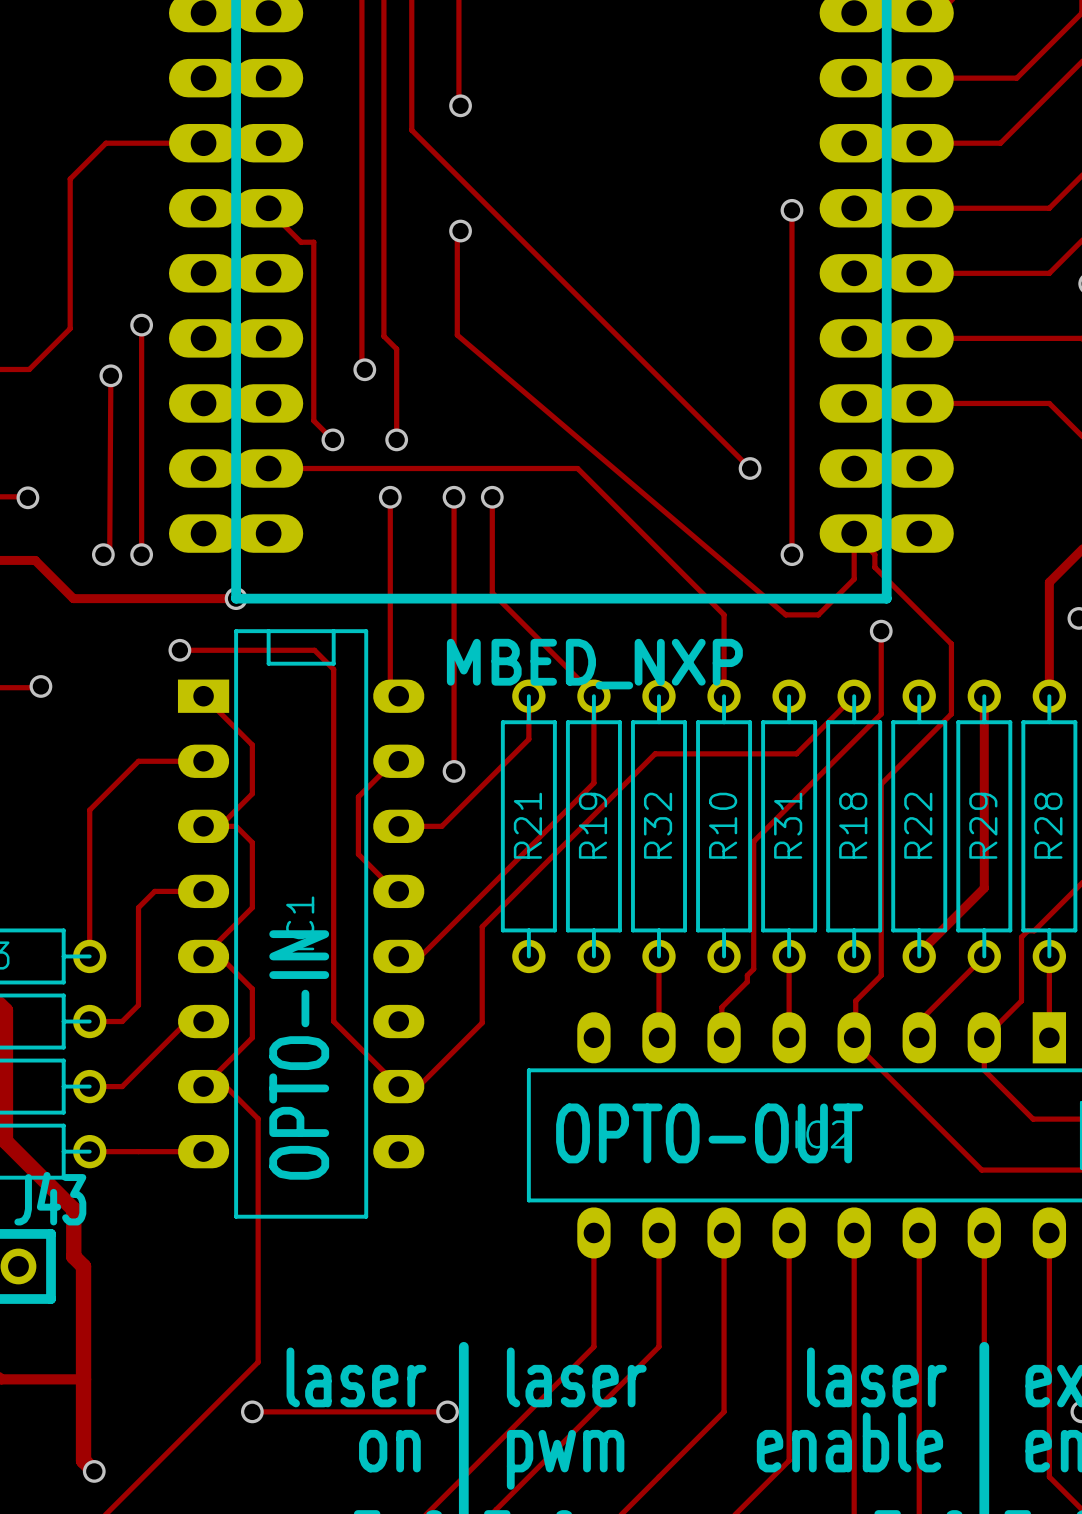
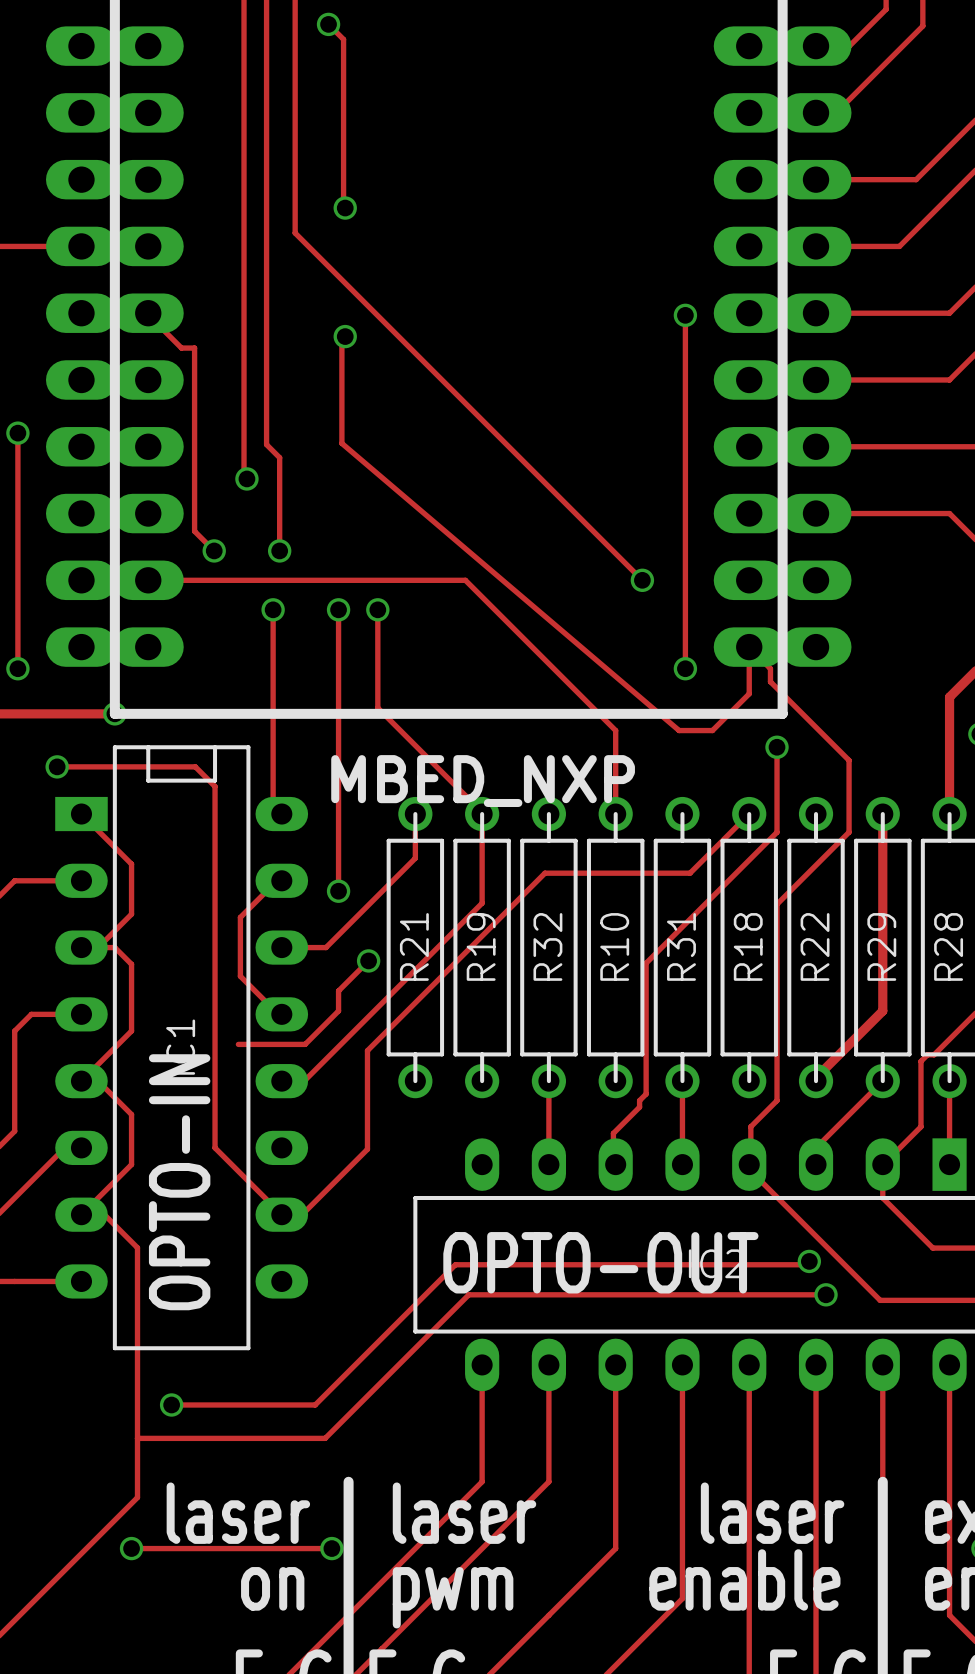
track: none -> (368, 960) (338, 990) (338, 1011) (305, 1044) (238, 1044)
via: none -> (368, 960)
track: none -> (809, 1261) (805, 1264) (455, 1264) (315, 1404) (171, 1404)
via: none -> (809, 1261)
track: none -> (826, 1294) (468, 1294) (325, 1438) (137, 1438)
via: none -> (826, 1294)
via: none -> (171, 1404)

